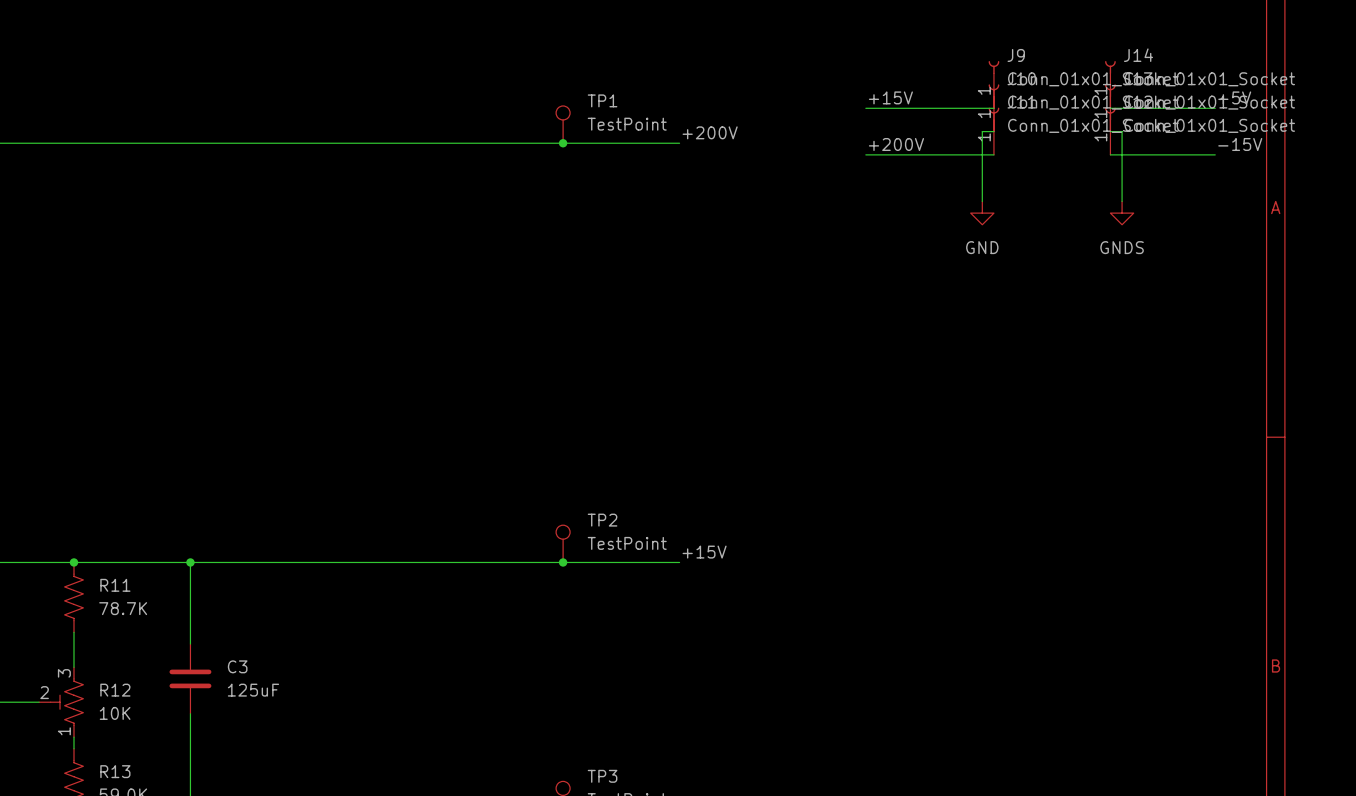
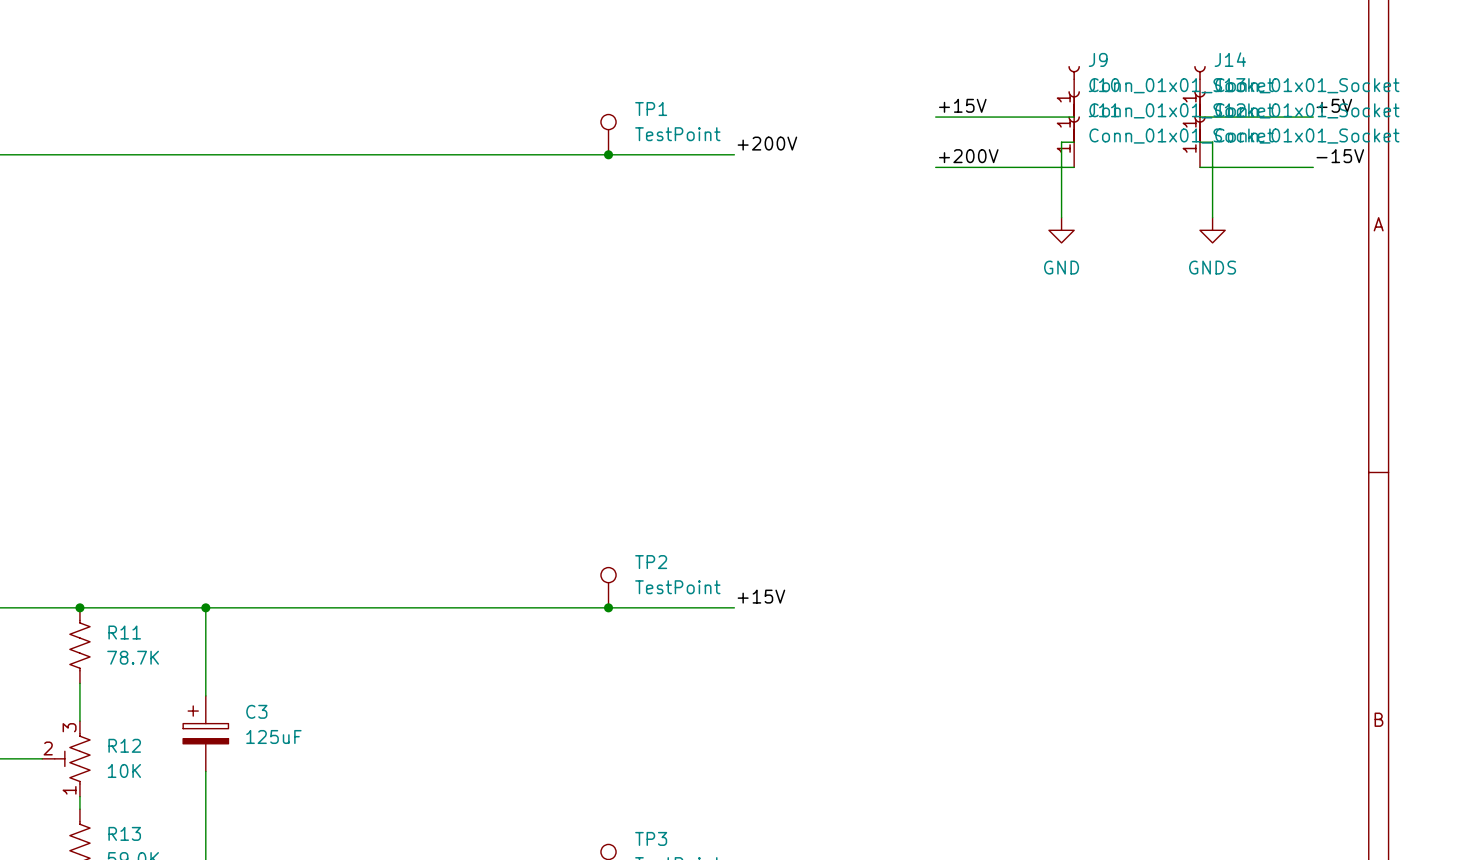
C3 symbol: [169, 643, 212, 714] -> [183, 695, 229, 772]

